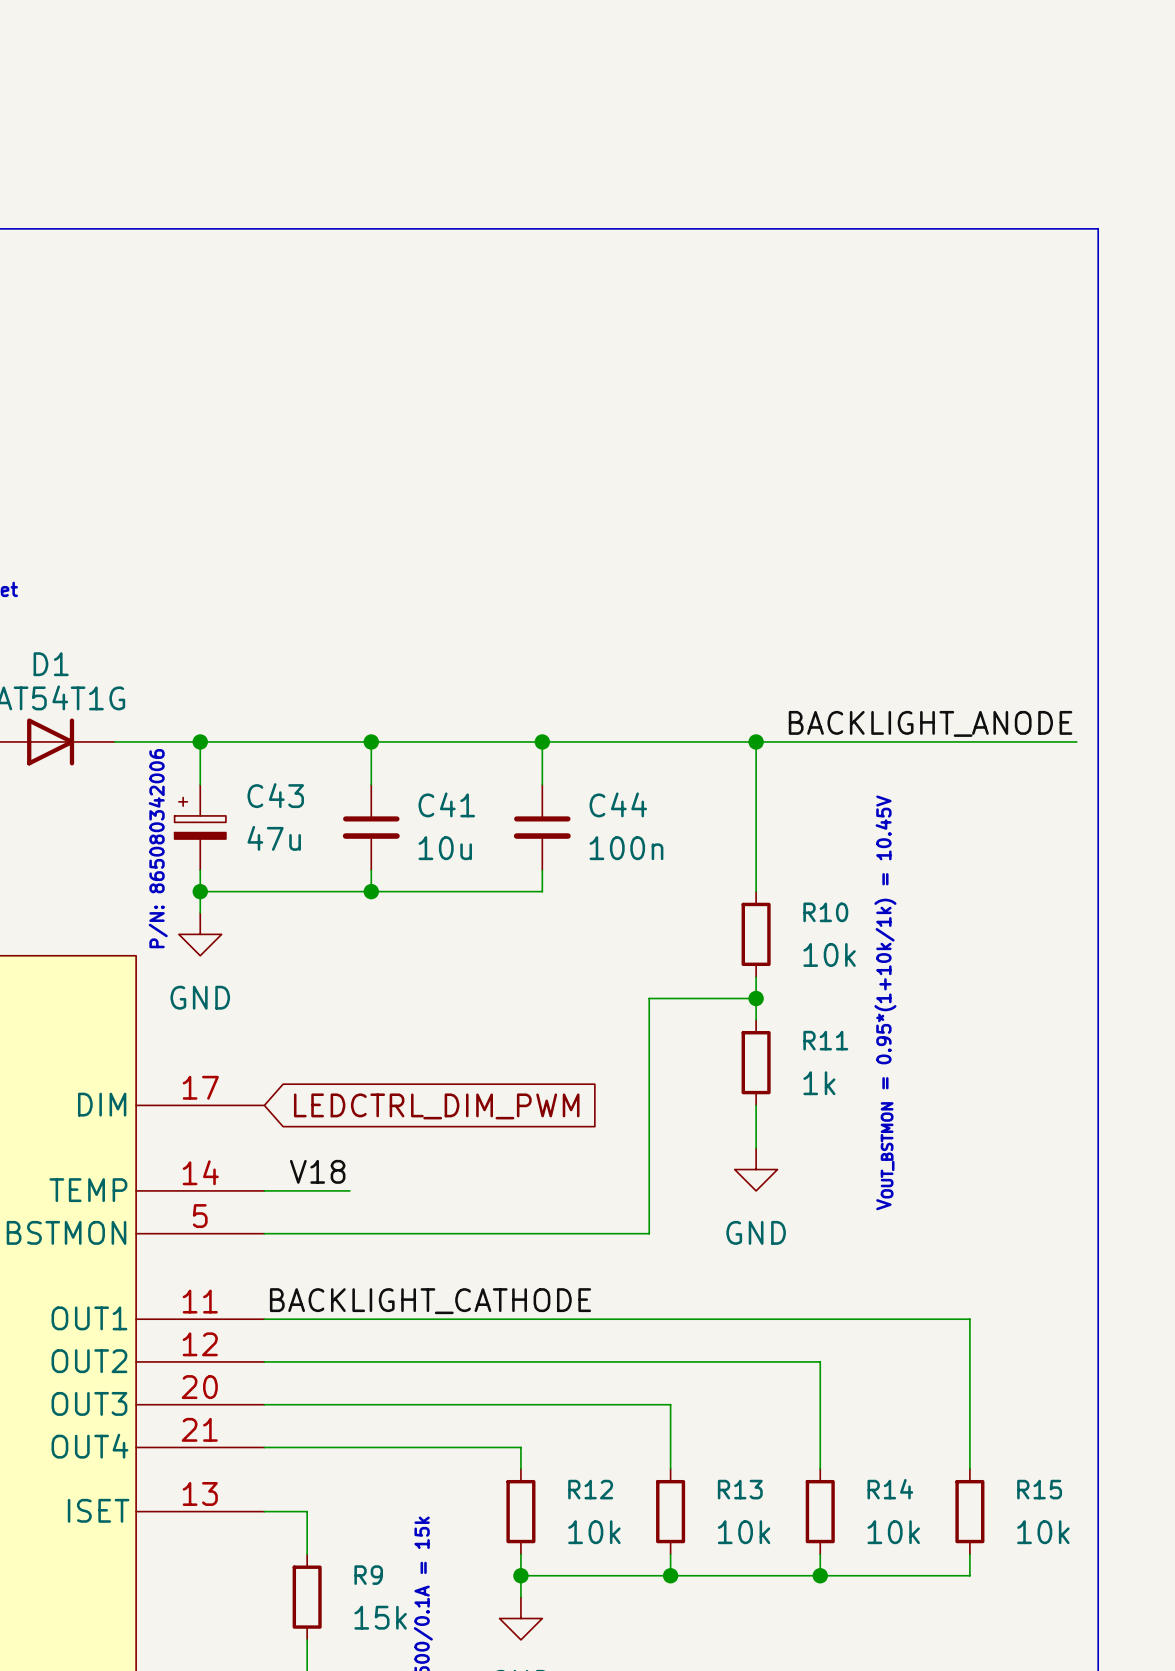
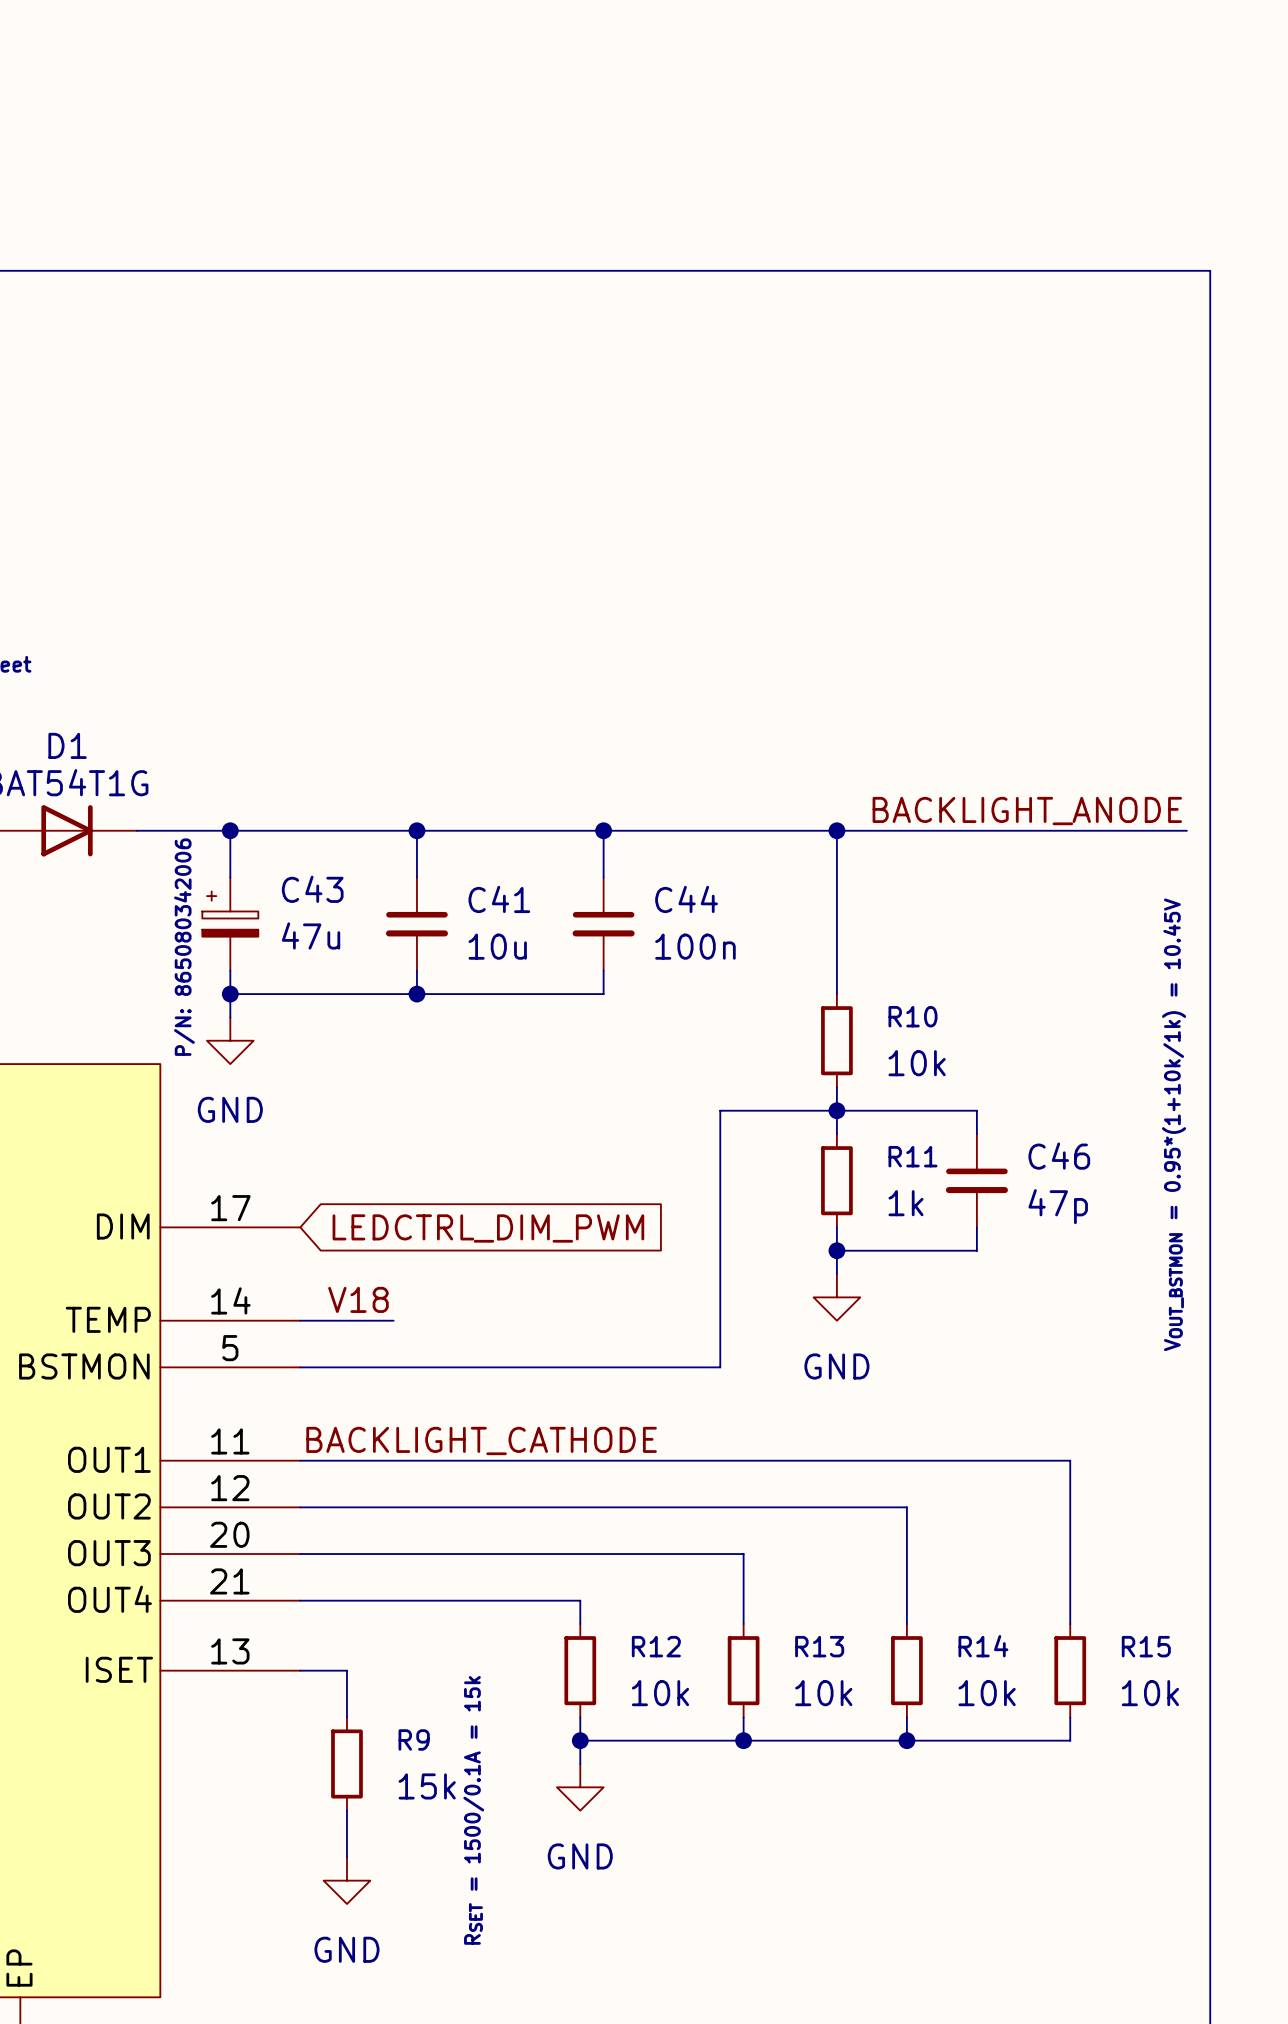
wire: none -> (836, 1110) (976, 1110) (976, 1134)
text position: VOUT_BSTMON = 0.95*(1+10k/1k) = 10.45V (885, 1002) -> VOUT_BSTMON = 0.95*(1+10k/1k) = 10.45V (1174, 1124)
C46: none -> 47p (976, 1180)
wire: none -> (976, 1227) (976, 1250) (836, 1250)
junction: none -> (836, 1250)

